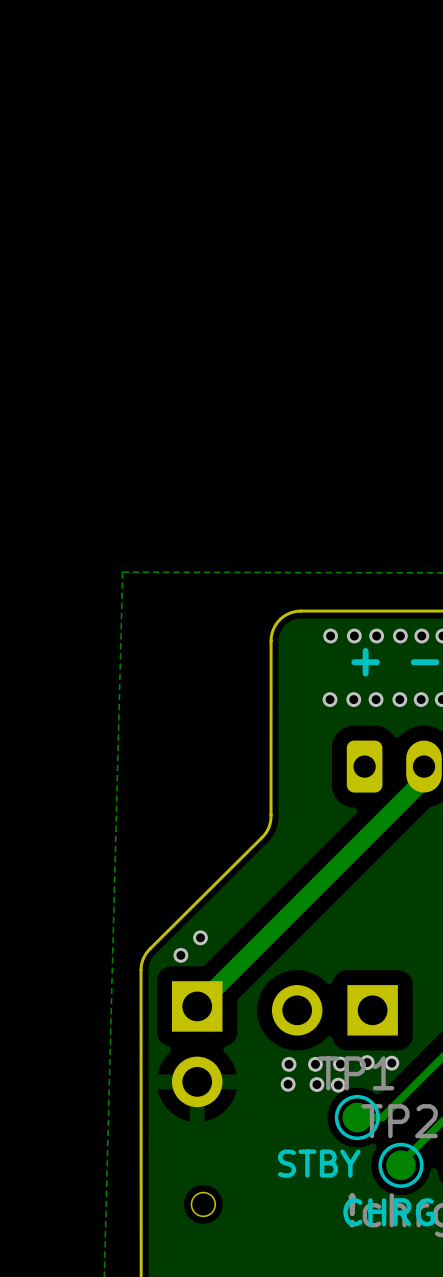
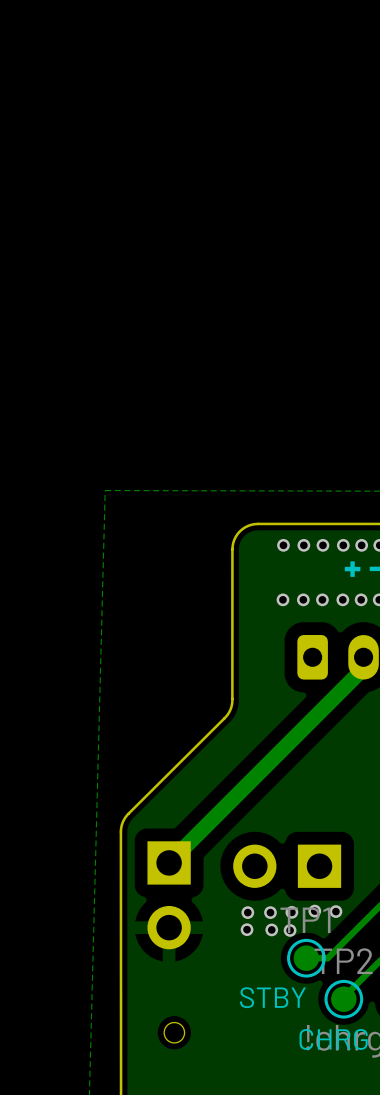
via: (200, 937) -> none
via: (180, 955) -> none

